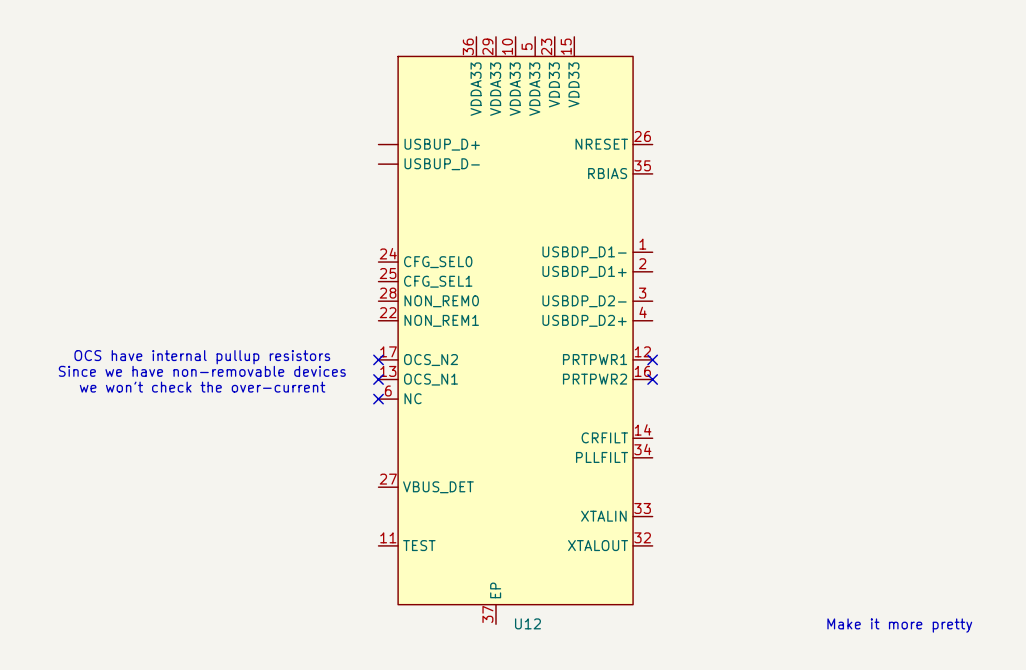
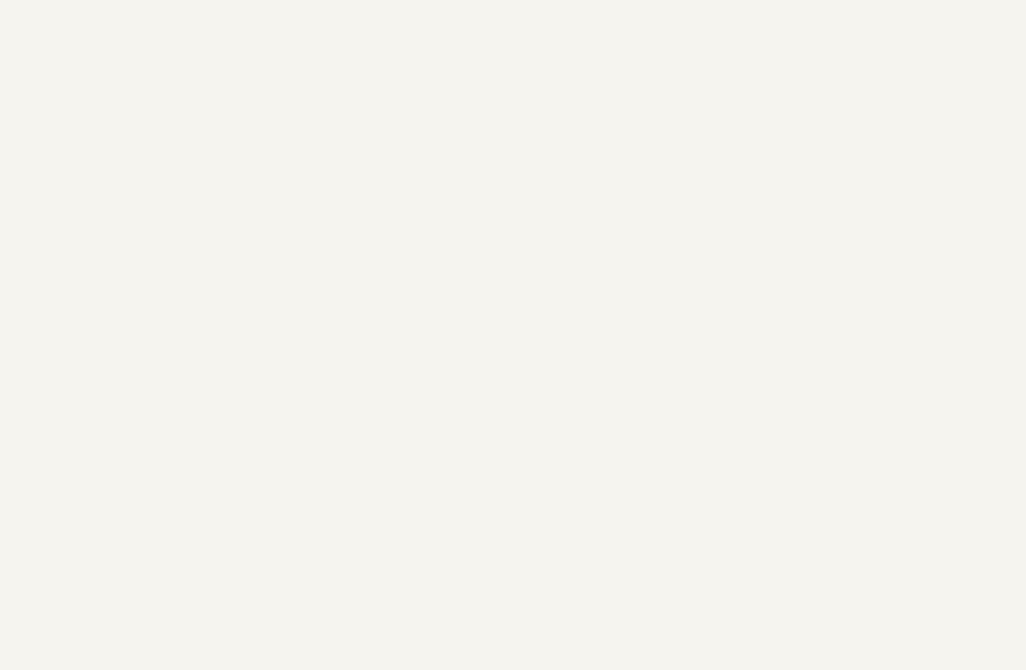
U12: (515, 330) -> none
text: OCS have internal pullup resistors (202, 357) -> none
no-connect mark: (378, 359) -> none
no-connect mark: (652, 359) -> none
text: Since we have non-removable devices (202, 371) -> none
no-connect mark: (378, 379) -> none
no-connect mark: (652, 379) -> none
text: we won't check the over-current (202, 387) -> none
no-connect mark: (378, 399) -> none
text: Make it more pretty (899, 625) -> none

